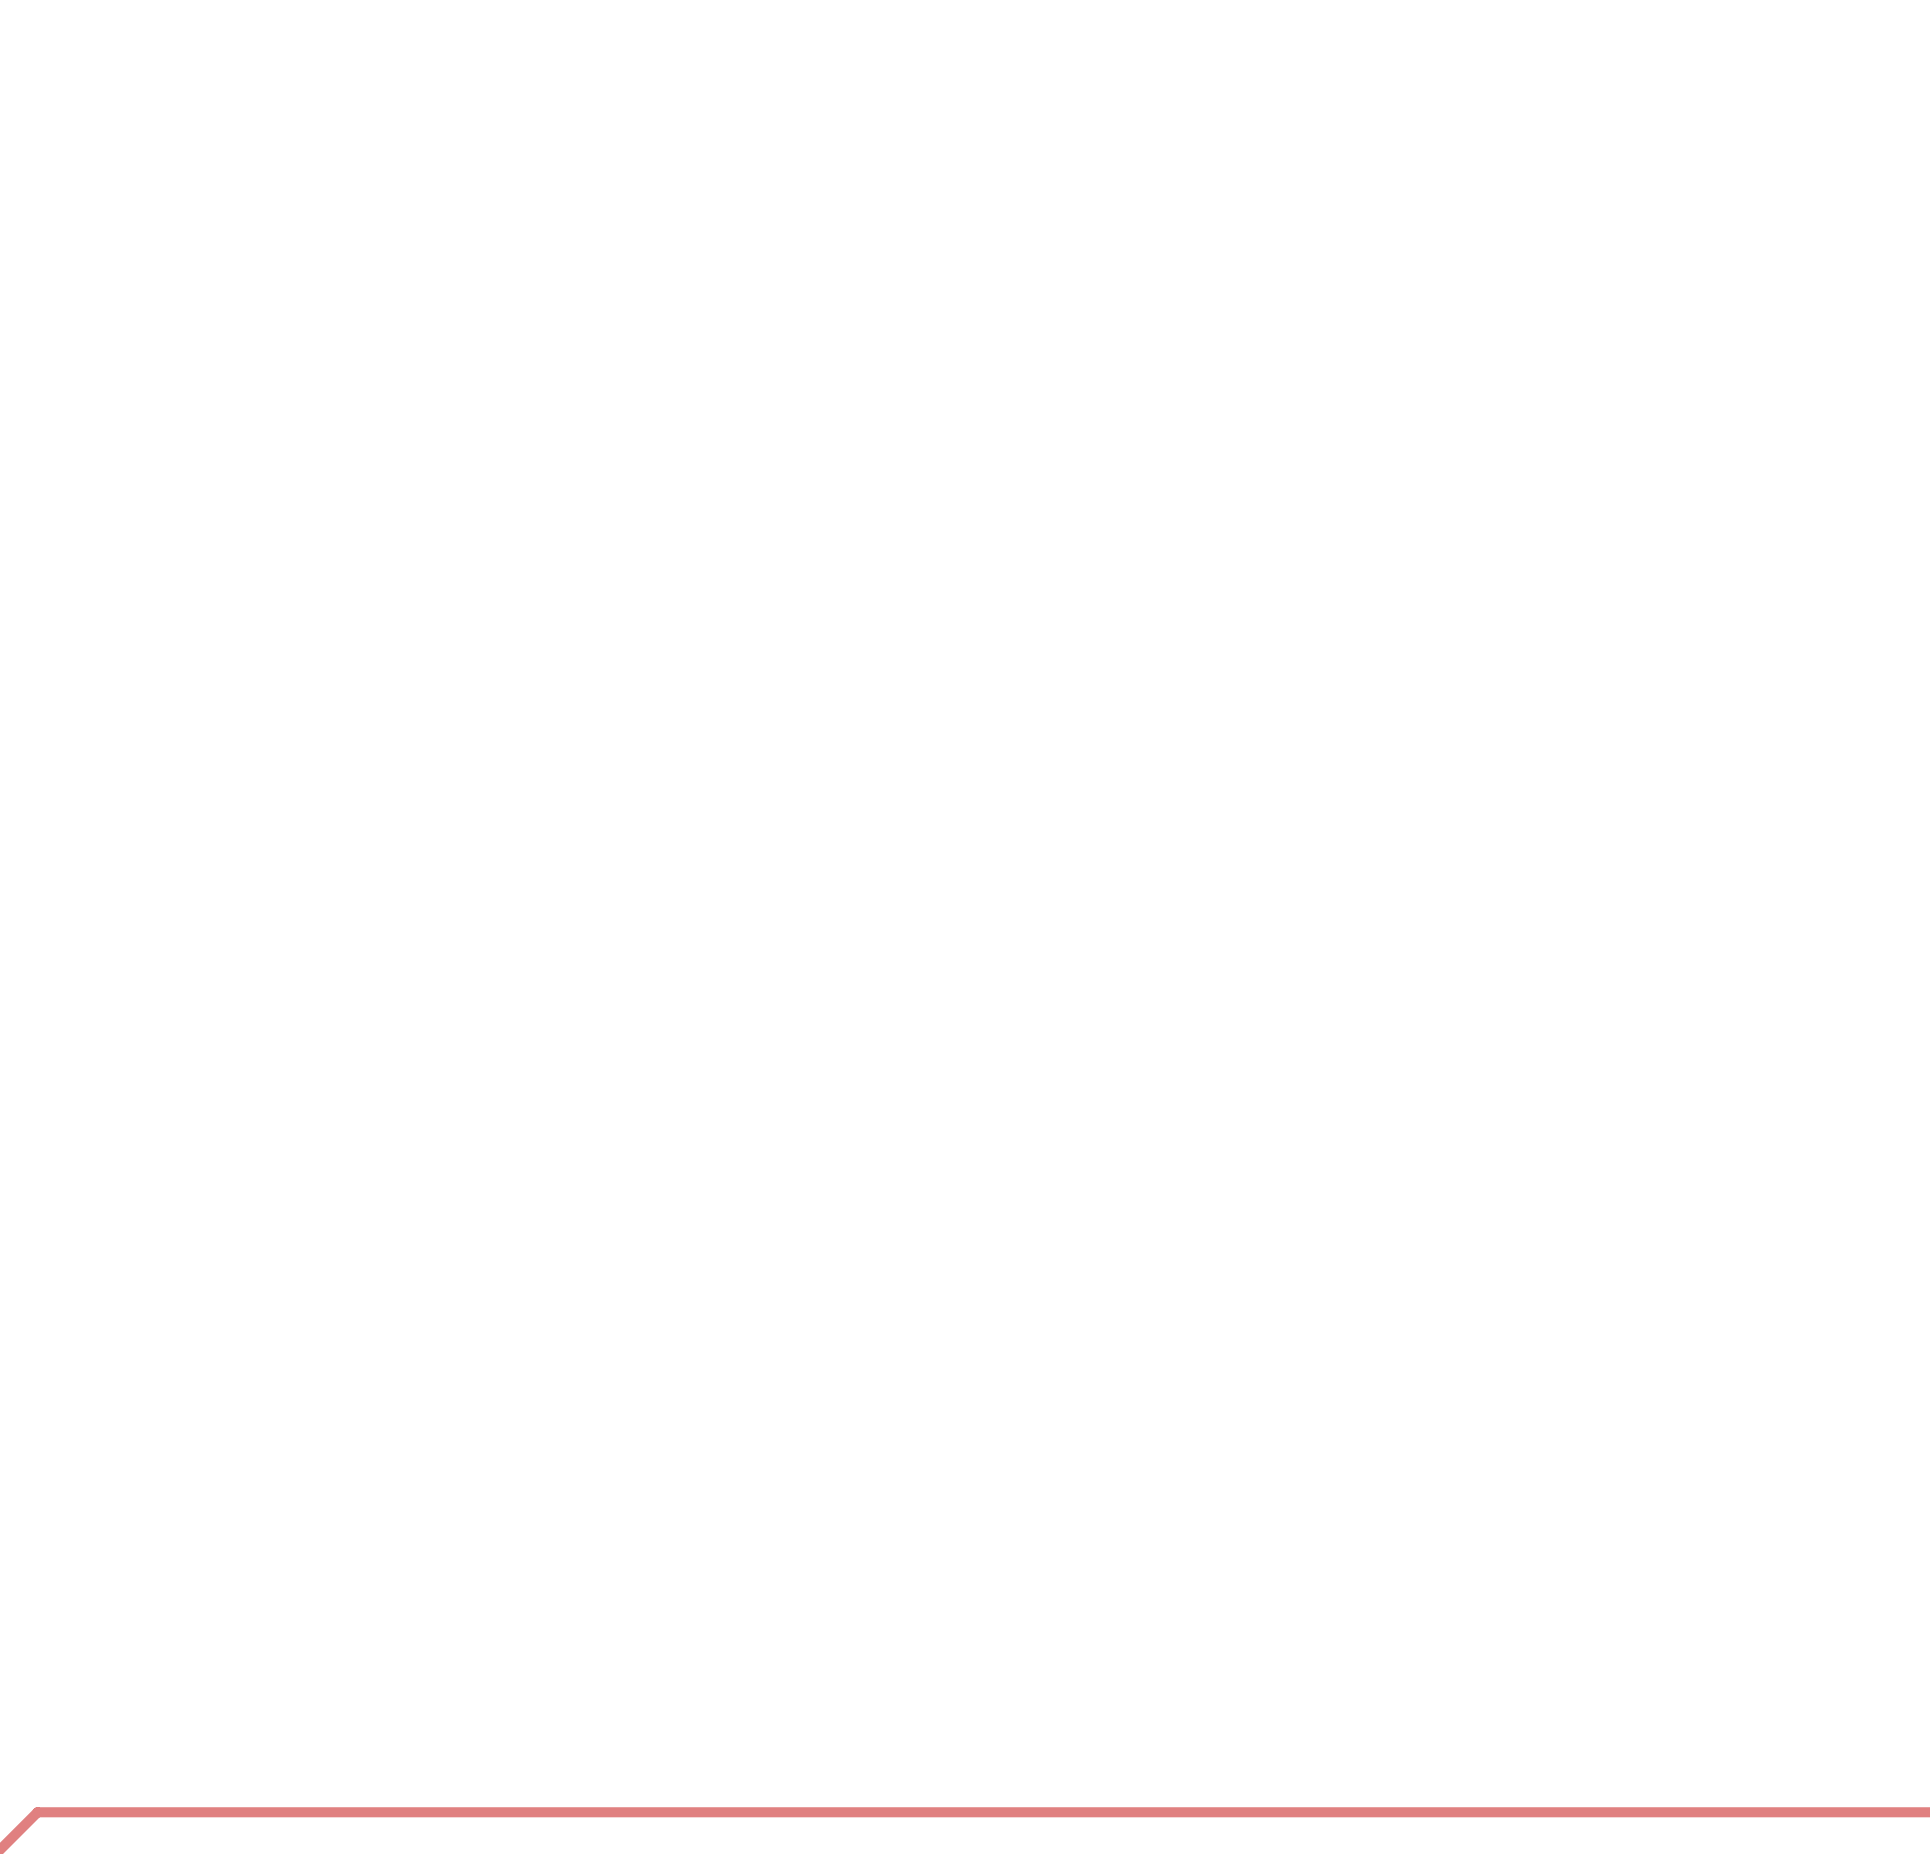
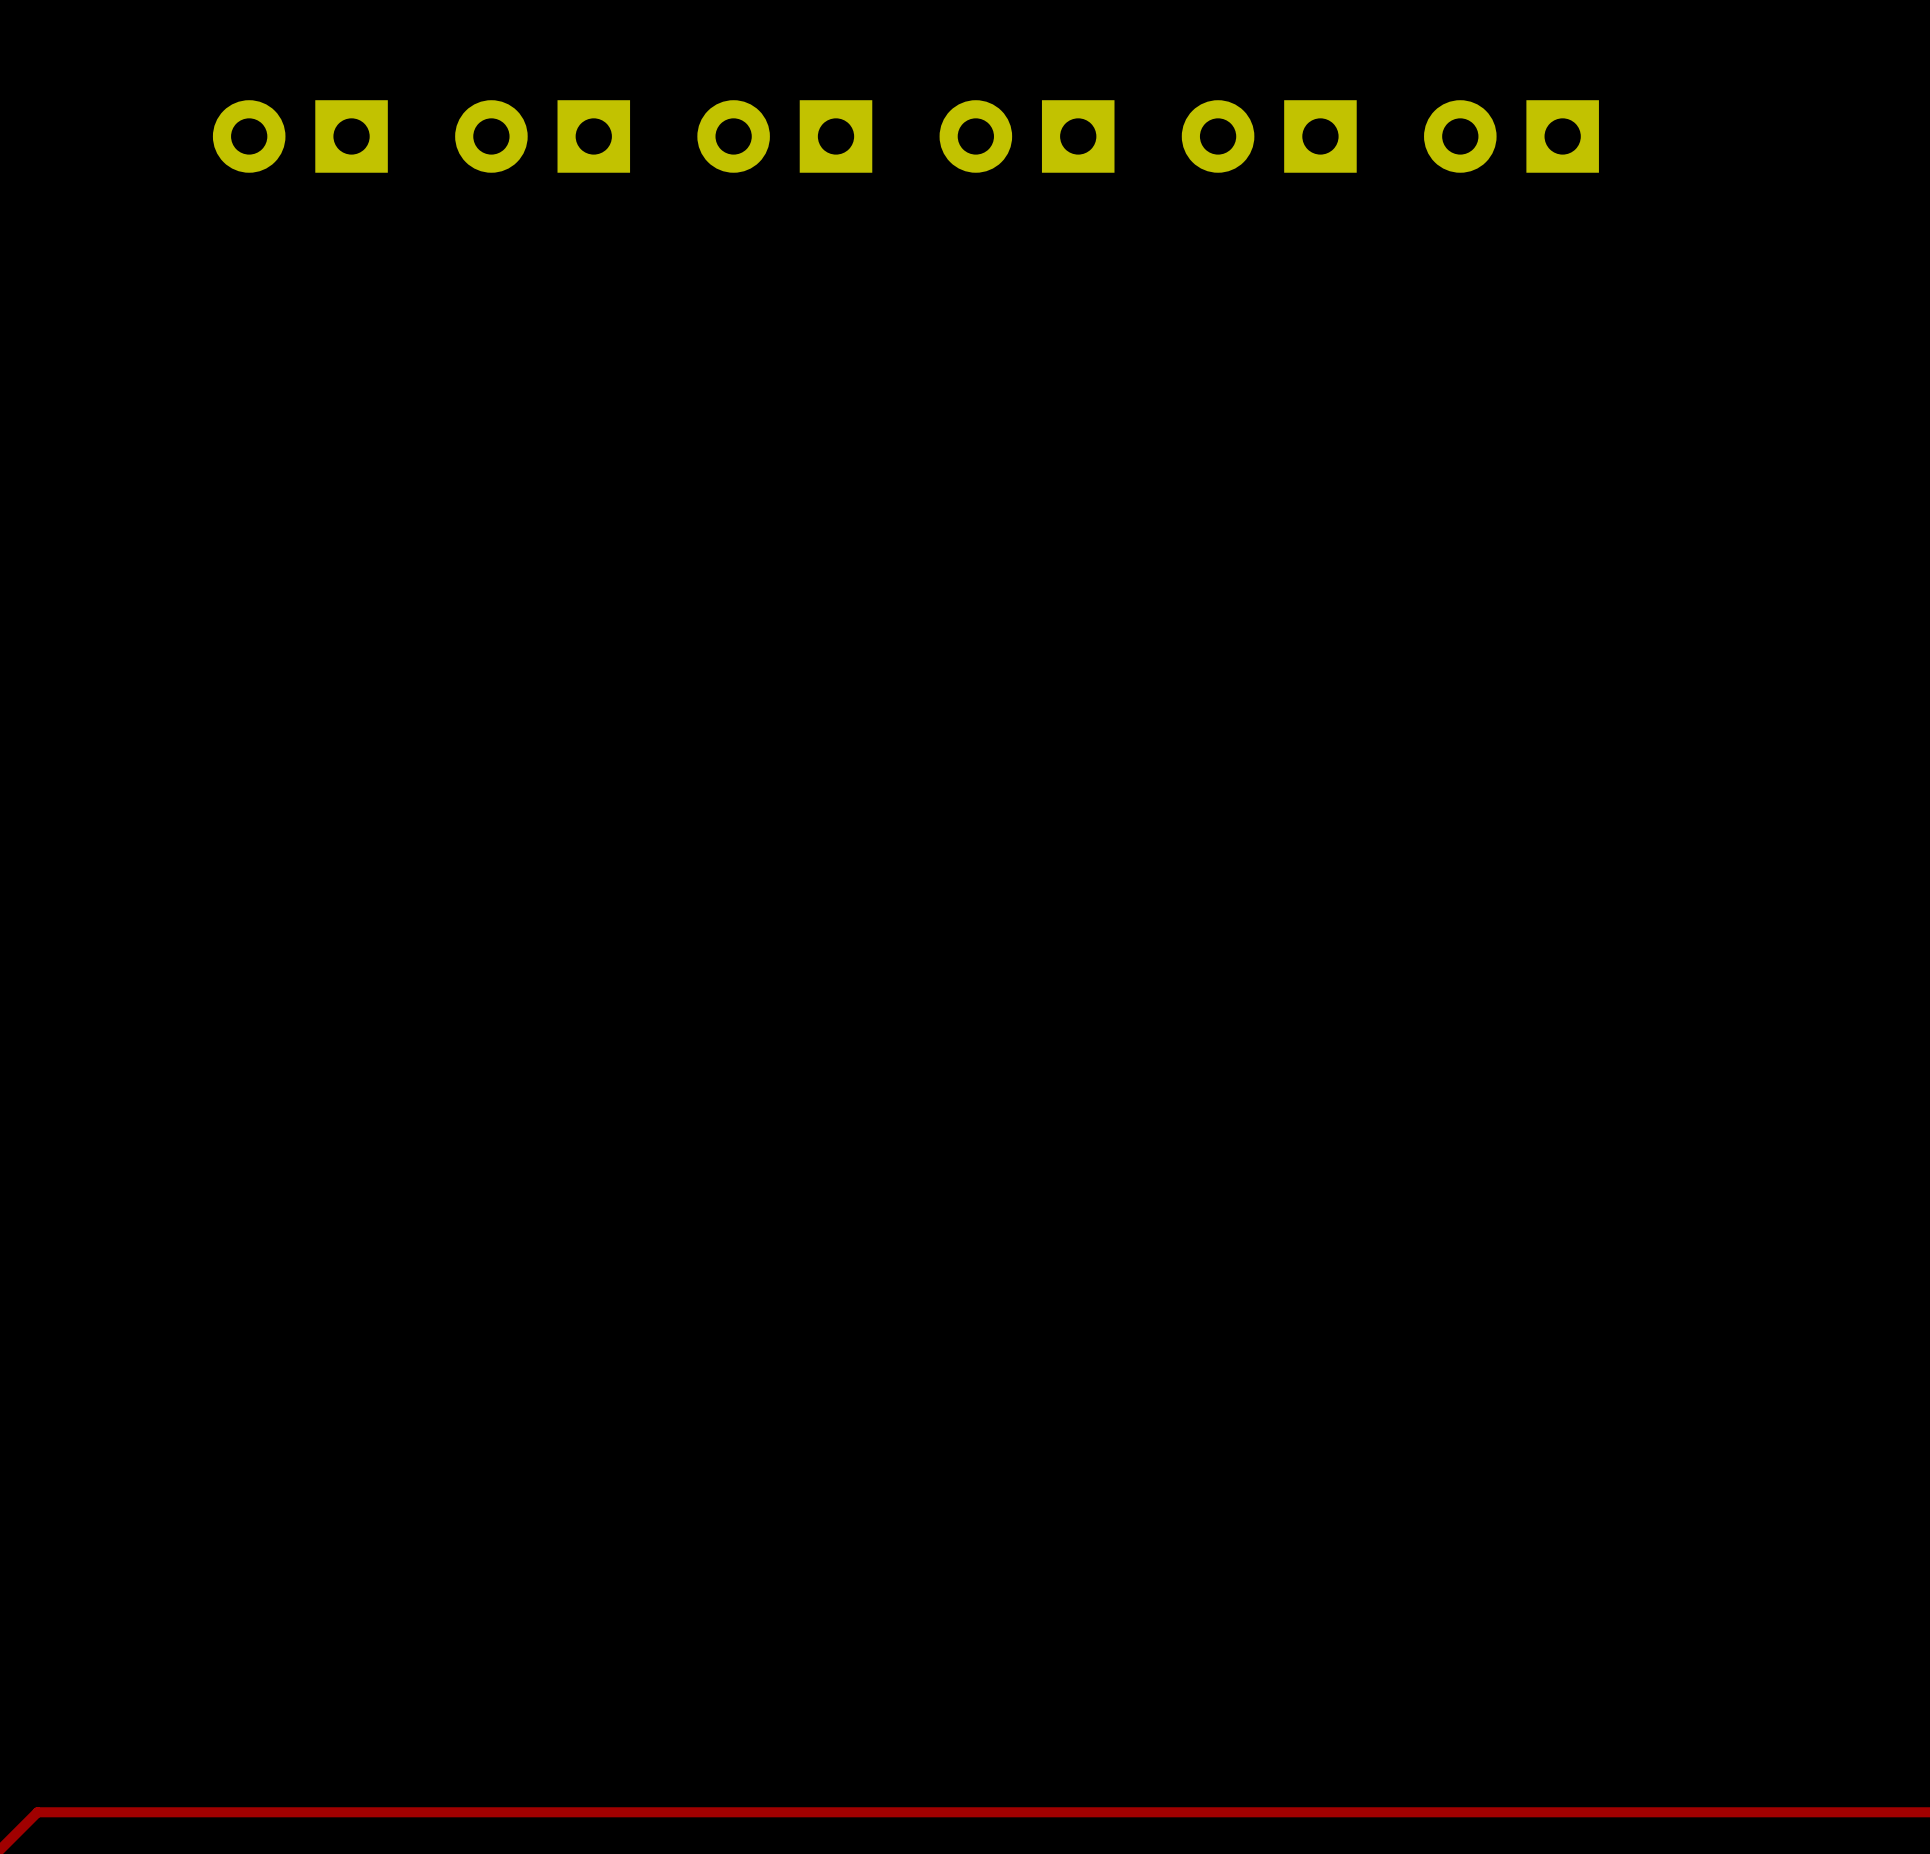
part: none -> (300, 136)
part: none -> (542, 136)
part: none -> (784, 136)
part: none -> (1027, 136)
part: none -> (1269, 136)
part: none -> (1511, 136)

